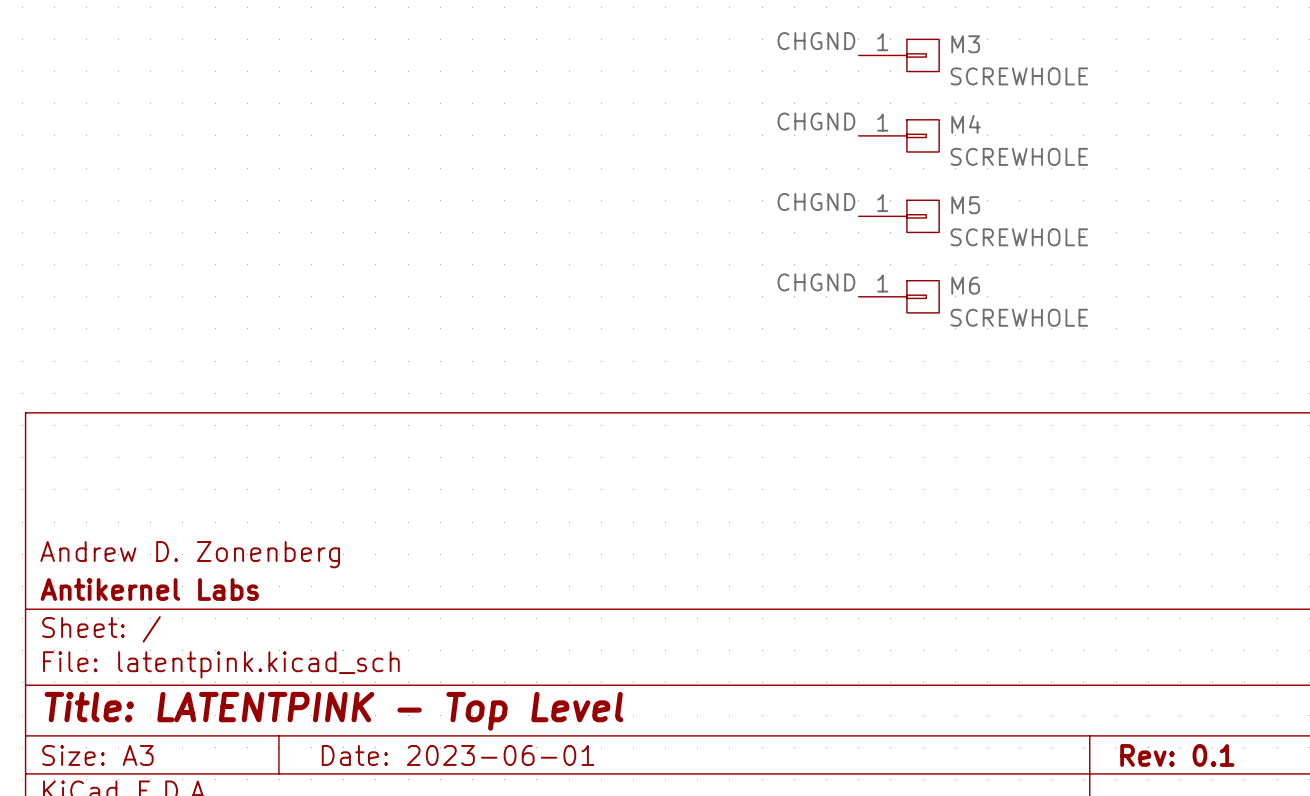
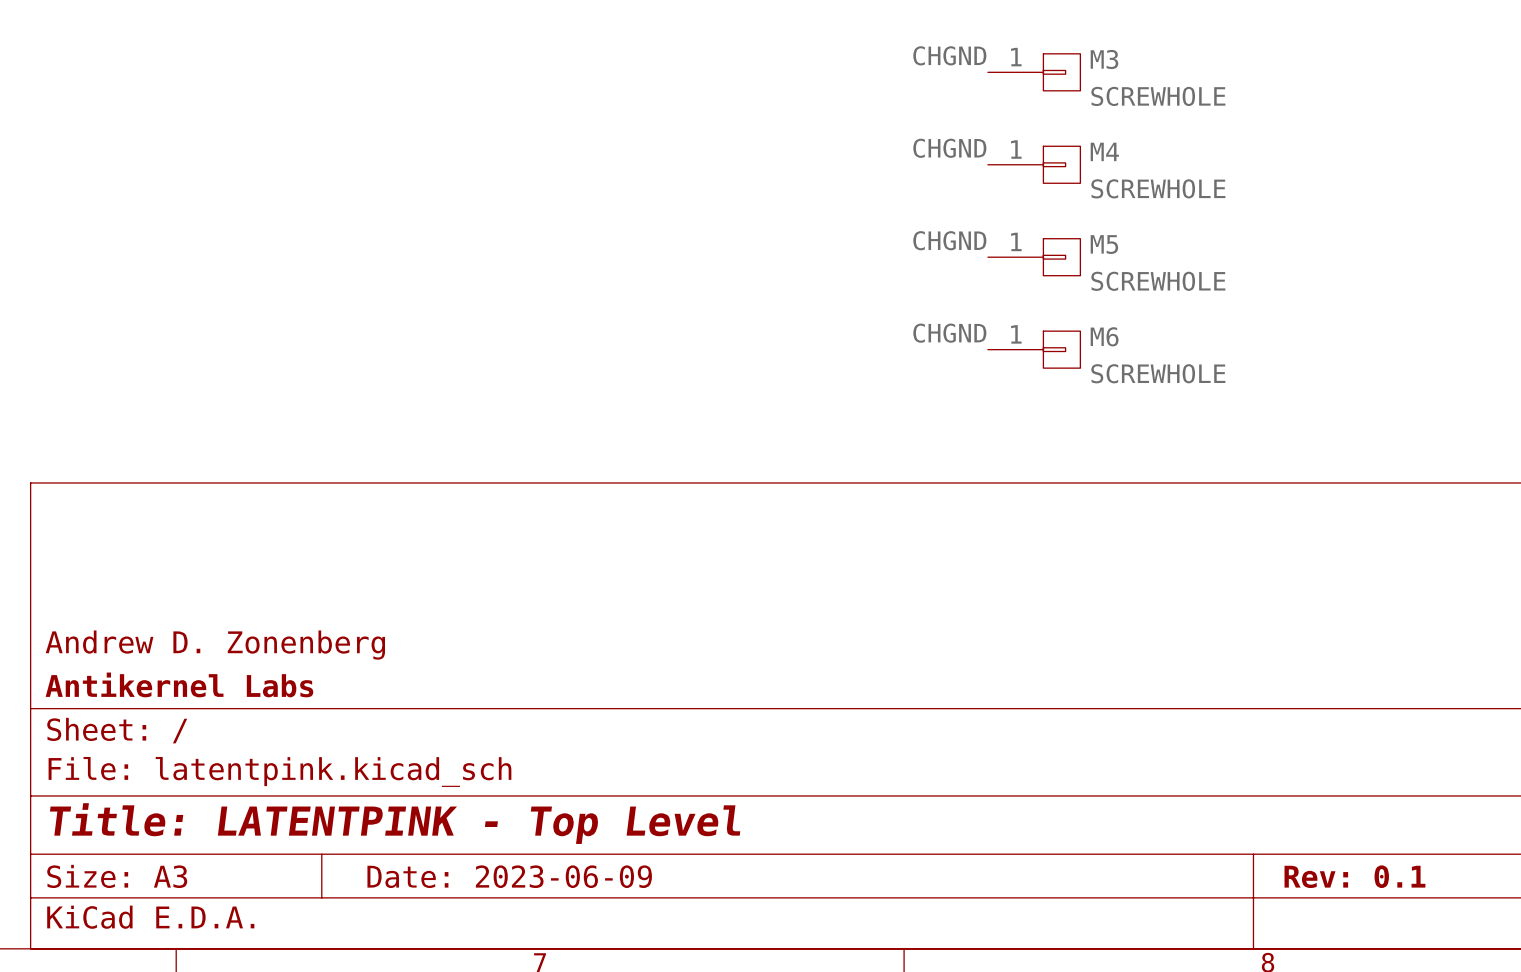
title block: Date: 2023-06-01 (458, 755) -> Date: 2023-06-09 (509, 876)

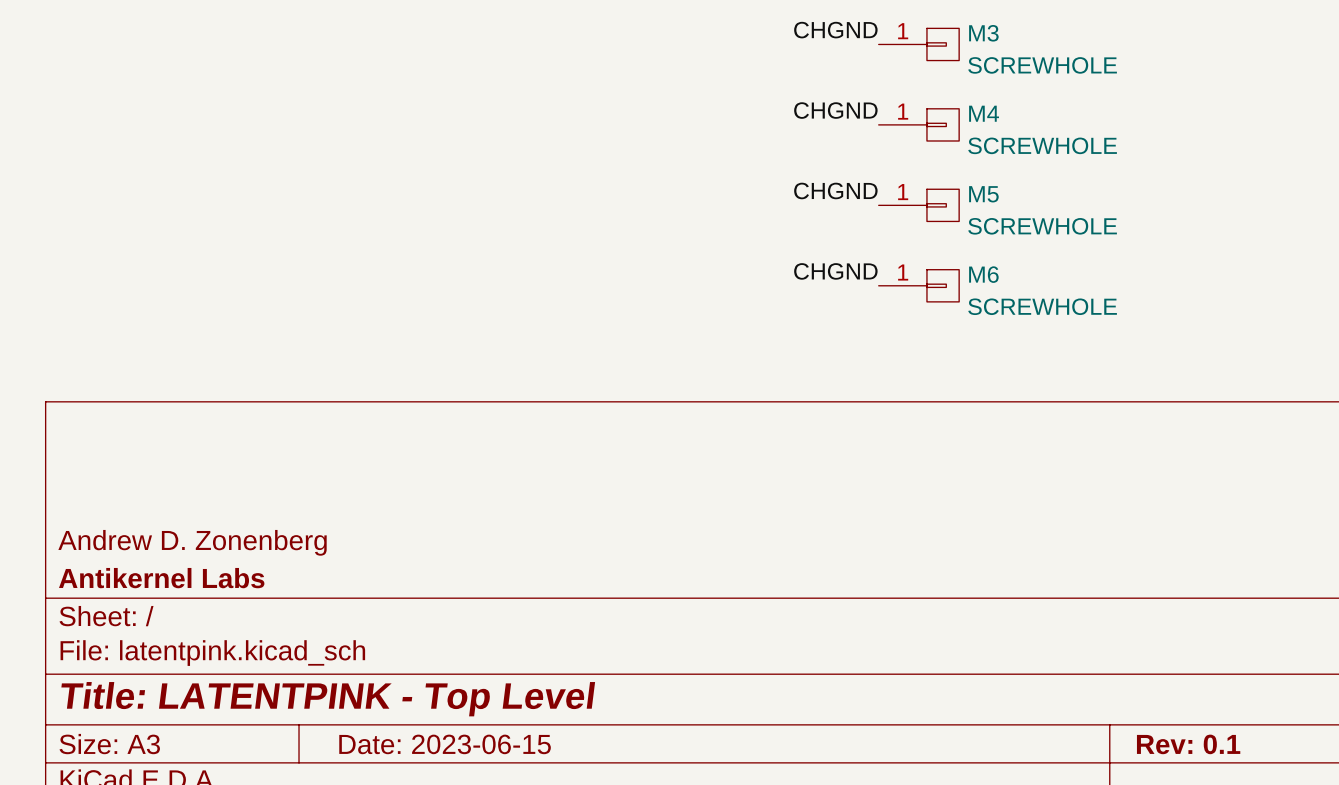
title block: Date: 2023-06-09 (509, 876) -> Date: 2023-06-15 (445, 744)

